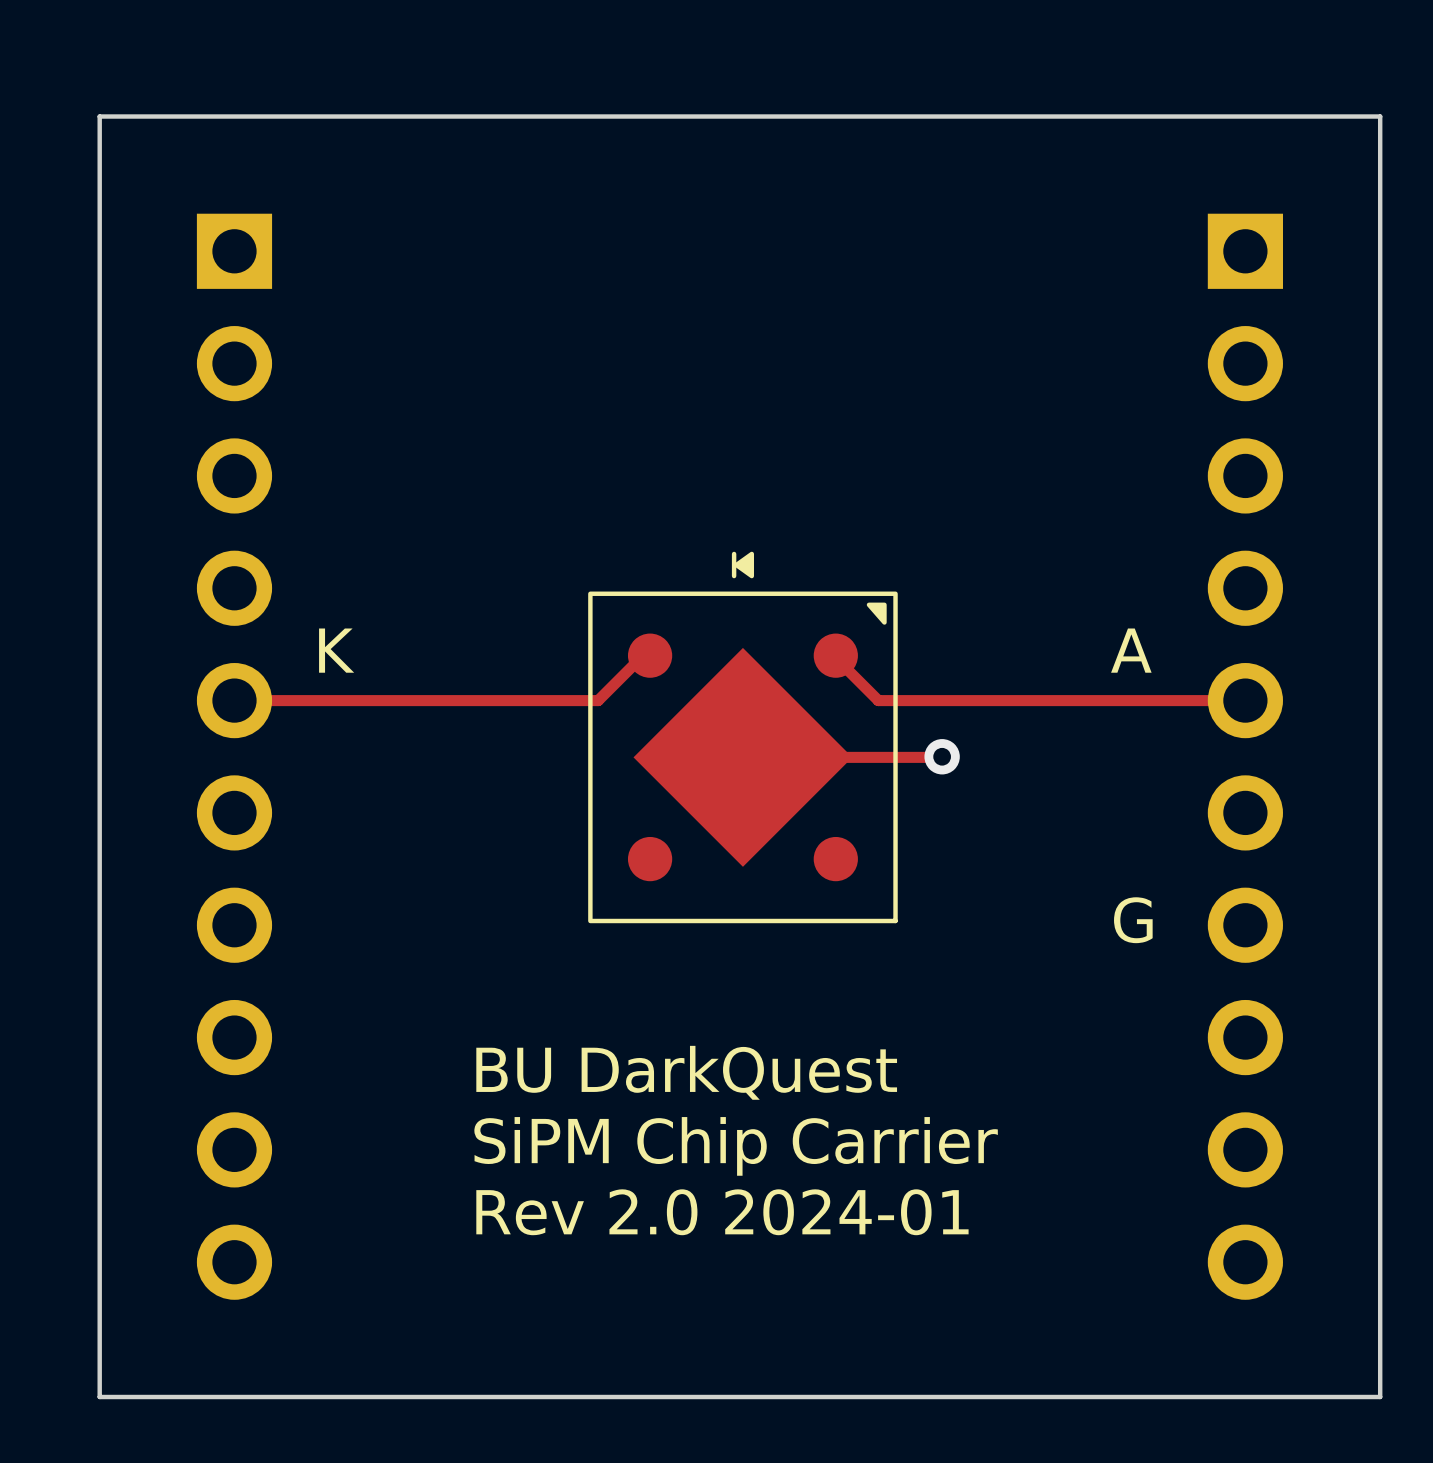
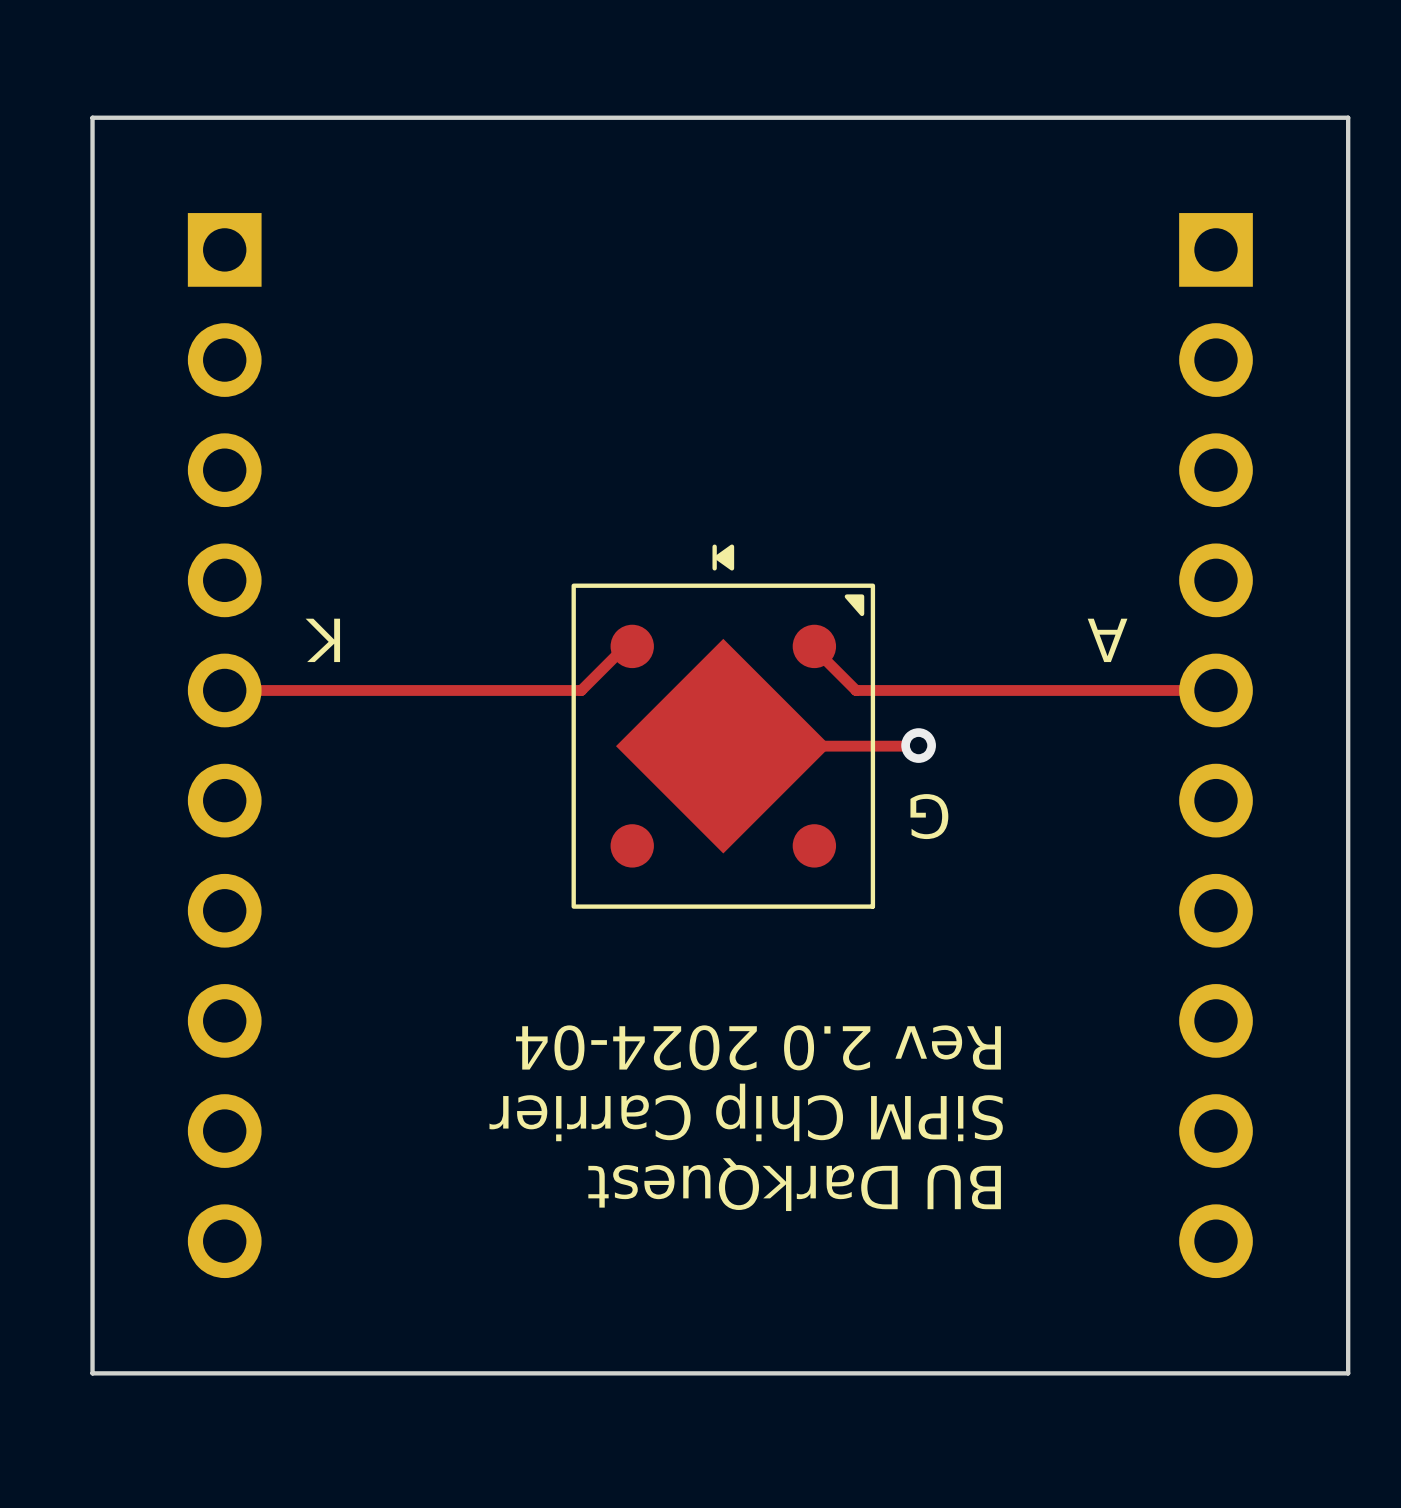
text rotation: 0° (336, 650) -> 180° (322, 640)
text rotation: 0° (1131, 650) -> 180° (1107, 640)
text rotation: 0° (1133, 920) -> 180° (929, 816)
text position: G (1133, 920) -> G (929, 816)
text: none -> Rev 2.0 2024-04 (758, 1047)
text rotation: 0° (686, 1072) -> 180° (794, 1184)
text rotation: 0° (736, 1146) -> 180° (746, 1112)
text: Rev 2.0 2024-01 (722, 1212) -> none

